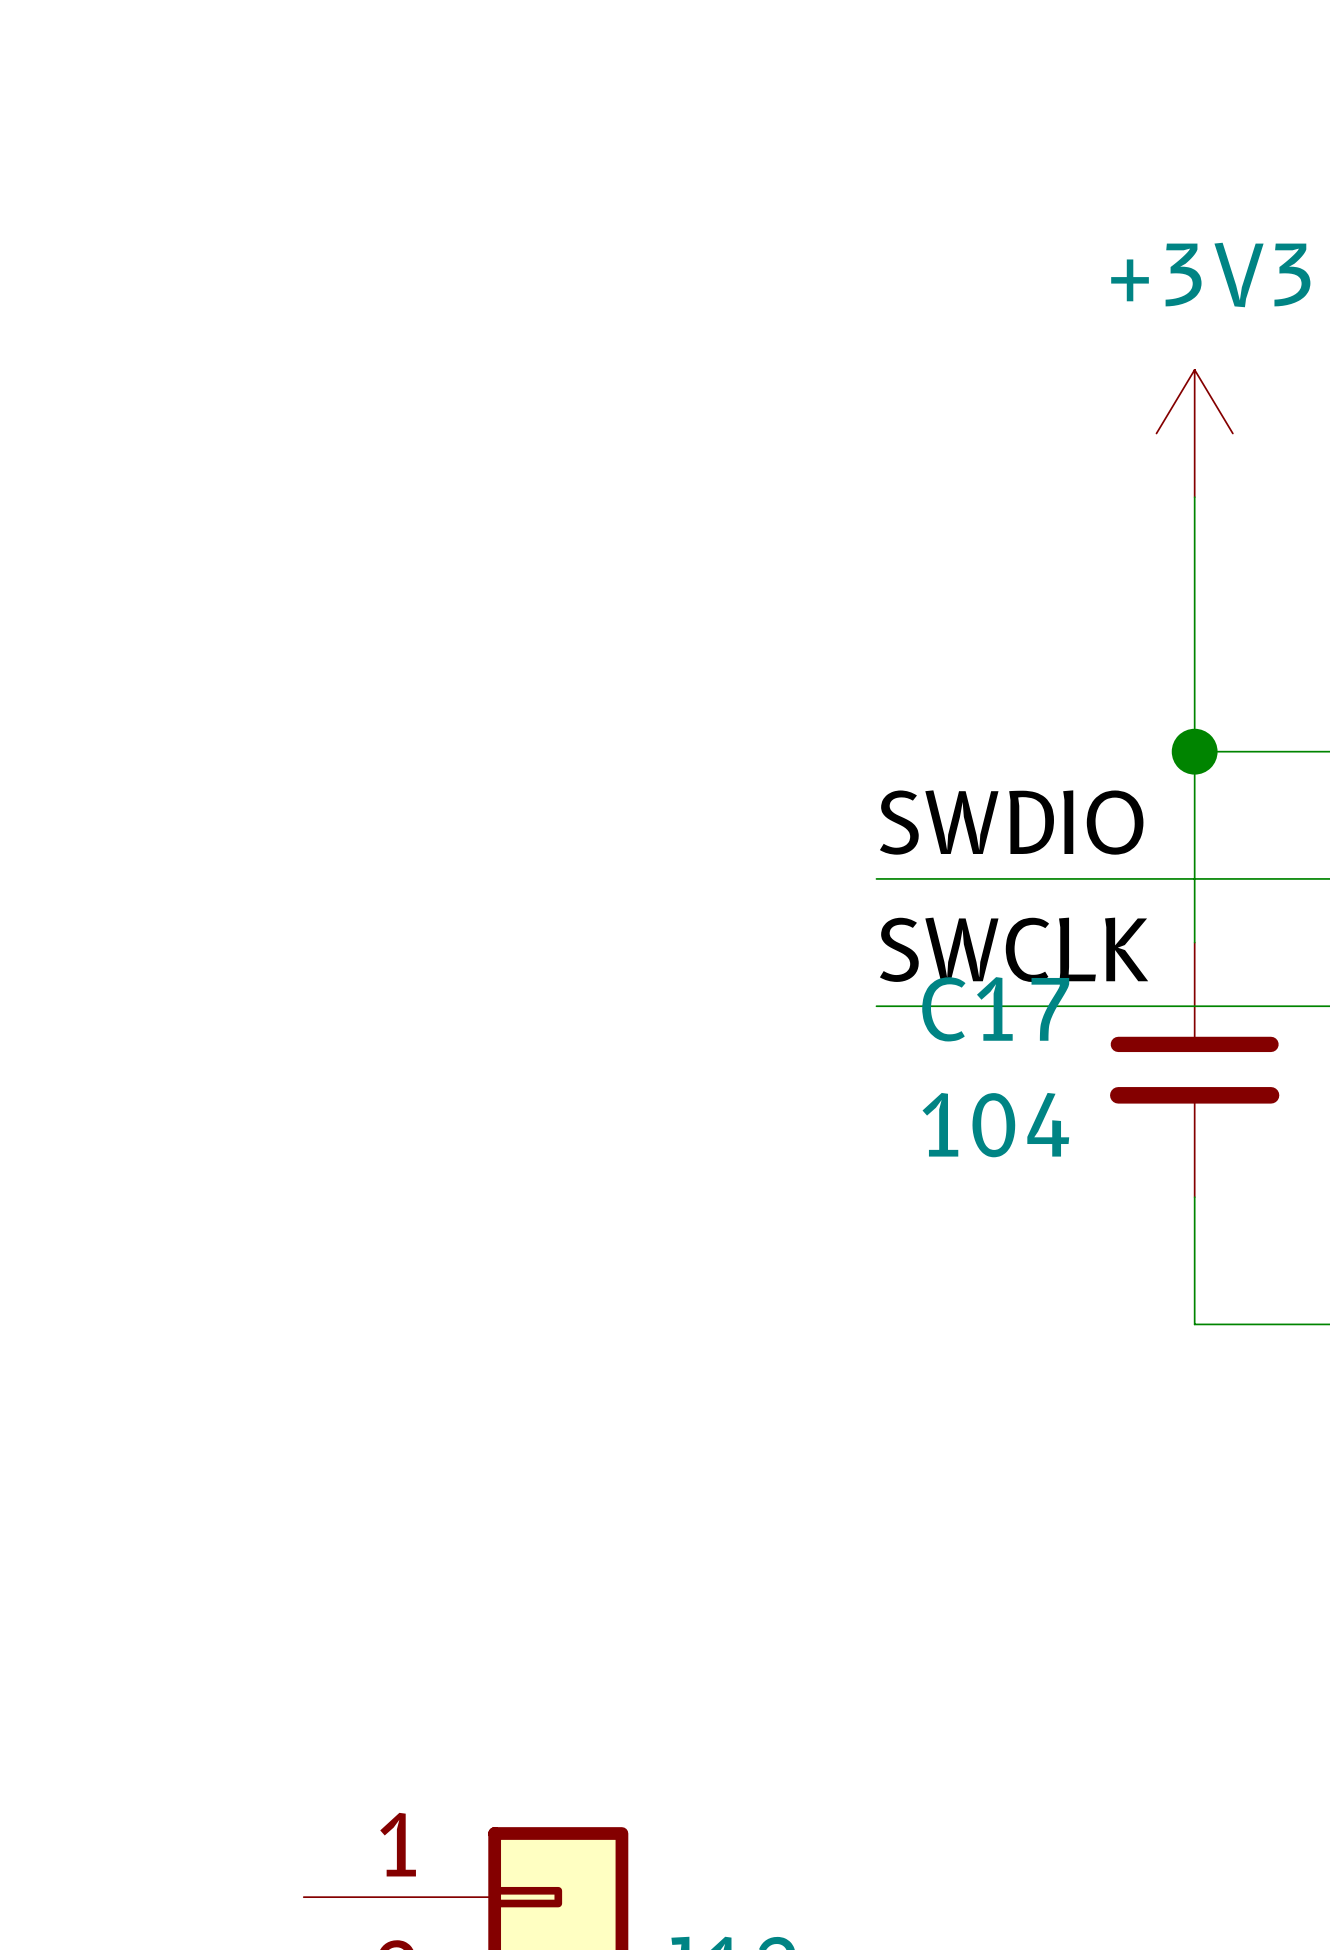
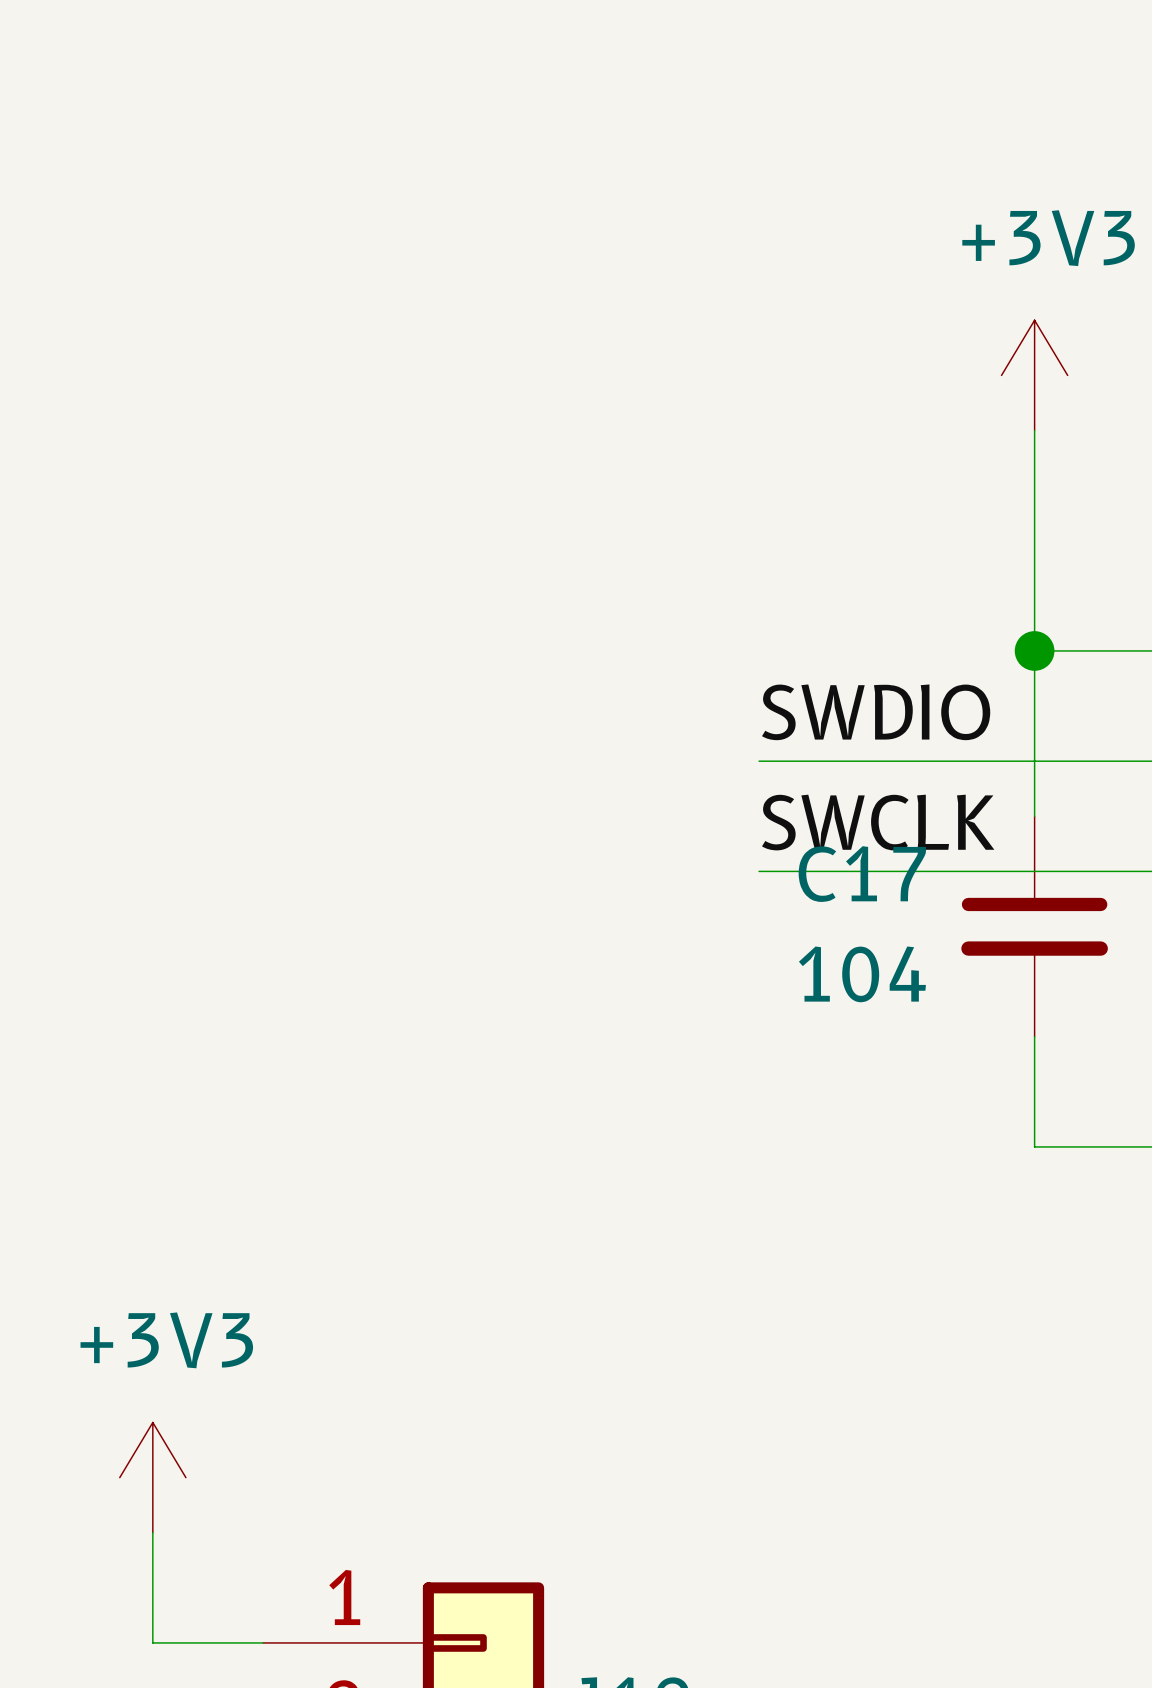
power symbol: none -> +3V3 (152, 1477)
wire: none -> (152, 1532) (152, 1642) (263, 1642)

